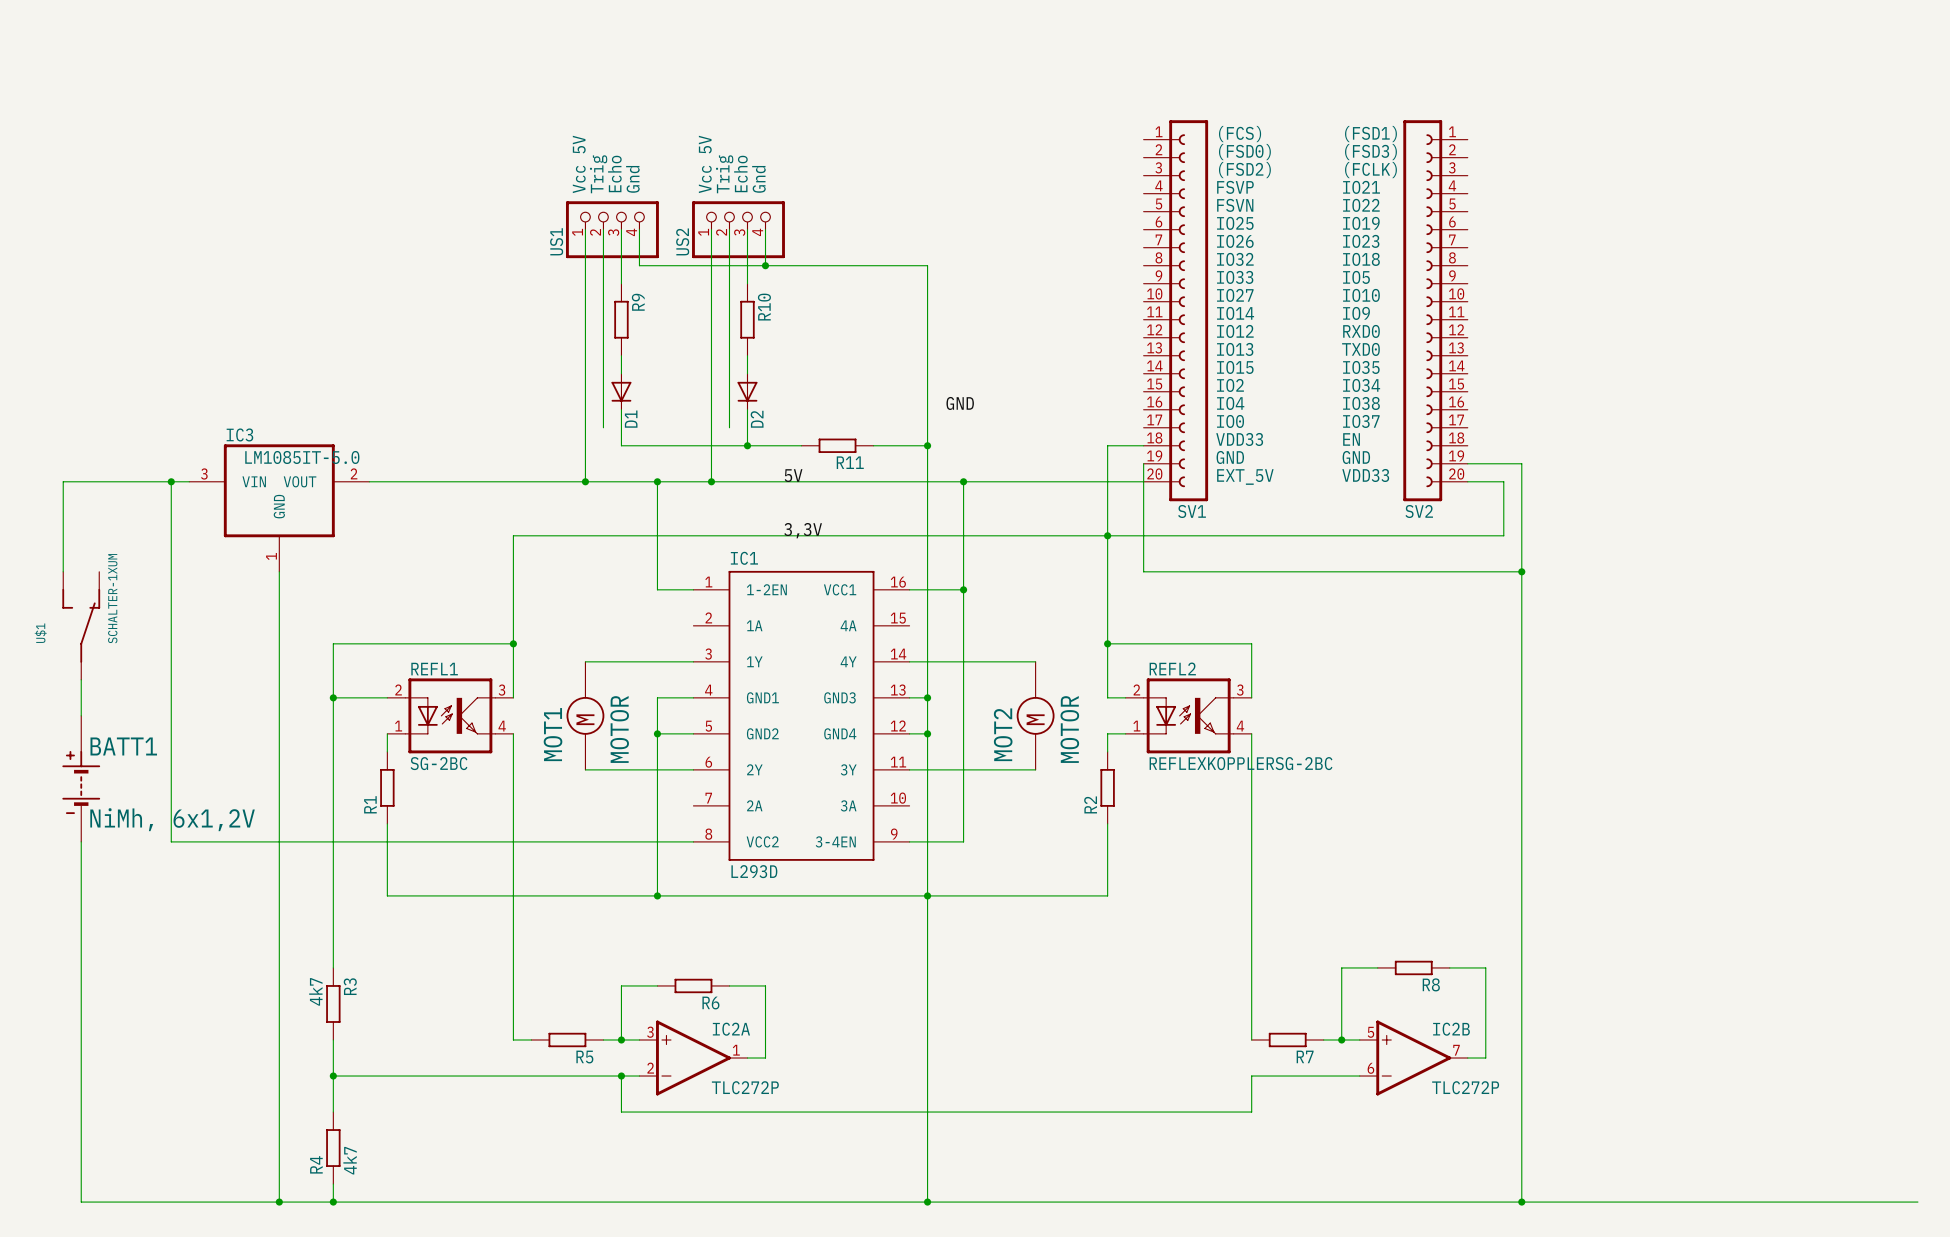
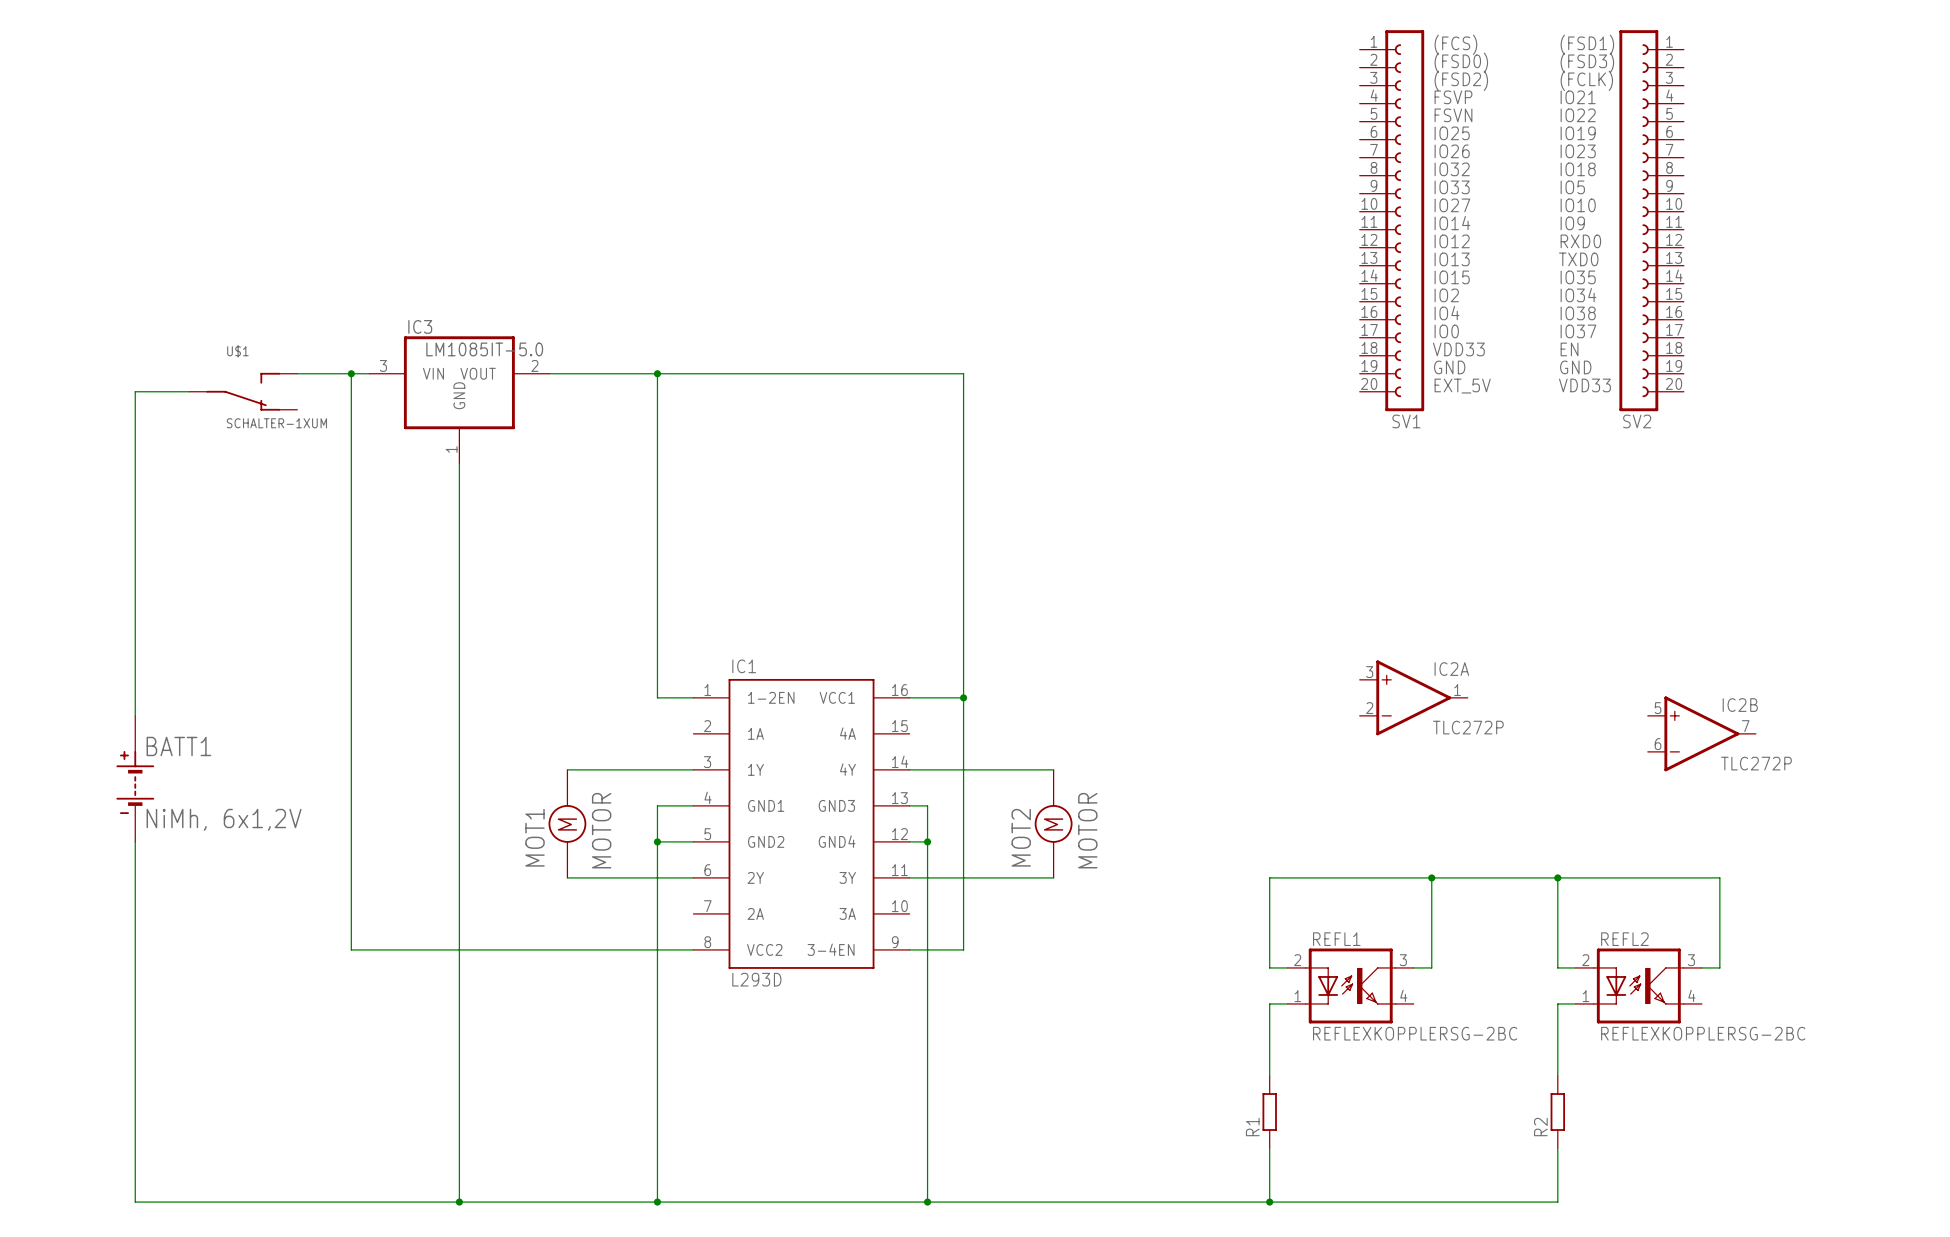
text: none -> (FCS) (1455, 44)
text: none -> (FSD1) (1587, 44)
text: none -> (FSD0) (1461, 62)
text: none -> (FSD3) (1587, 62)
text: none -> (FSD2) (1461, 80)
text: none -> (FCLK) (1586, 80)
text: none -> FSVP (1453, 97)
text: none -> IO21 (1578, 97)
text: none -> FSVN (1453, 115)
text: none -> IO22 (1578, 115)
text: none -> IO25 (1452, 133)
text: none -> IO19 (1578, 133)
text: (FCS) (1240, 134) -> none
text: (FSD1) (1370, 134) -> none
text: none -> IO26 (1452, 151)
text: none -> IO23 (1578, 151)
text: (FSD0) (1244, 152) -> none
text: (FSD3) (1370, 152) -> none
text: Vcc 5V (579, 164) -> none
text: Vcc 5V (705, 164) -> none
text: none -> IO32 (1452, 169)
text: none -> IO18 (1578, 169)
text: (FSD2) (1244, 170) -> none
text: (FCLK) (1370, 170) -> none
text: Echo (614, 173) -> none
text: Echo (740, 173) -> none
text: Trig (598, 174) -> none
text: Trig (724, 174) -> none
text: Gnd (632, 179) -> none
text: Gnd (758, 179) -> none
text: FSVP (1235, 187) -> none
text: IO21 (1361, 187) -> none
text: none -> IO33 (1452, 187)
text: none -> IO5 (1572, 187)
text: FSVN (1235, 205) -> none
text: IO22 (1361, 205) -> none
text: none -> IO27 (1452, 205)
text: none -> IO10 (1578, 205)
text: IO25 (1235, 223) -> none
text: IO19 (1361, 223) -> none
text: none -> IO14 (1452, 223)
text: none -> IO9 (1572, 223)
wire: (585, 229) (585, 481) -> none
wire: (603, 229) (603, 427) -> none
US1: (612, 229) -> none
wire: (621, 229) (621, 283) -> none
wire: (639, 229) (639, 265) (927, 265) (927, 805) -> (909, 805) (927, 805)
wire: (711, 229) (711, 481) -> none
wire: (729, 229) (729, 427) -> none
US2: (738, 229) -> none
wire: (747, 229) (747, 283) -> none
wire: (765, 229) (765, 265) -> none
text: IO26 (1235, 241) -> none
text: IO23 (1361, 241) -> none
text: none -> IO12 (1452, 241)
text: none -> RXD0 (1580, 241)
text: IO32 (1235, 259) -> none
text: IO18 (1361, 259) -> none
text: none -> IO13 (1452, 259)
text: none -> TXD0 (1578, 259)
junction: (765, 265) -> none
text: IO33 (1235, 277) -> none
text: IO5 (1356, 277) -> none
text: none -> IO15 (1452, 277)
text: none -> IO35 (1578, 277)
text: IO27 (1235, 295) -> none
text: IO10 (1361, 295) -> none
text: none -> IO2 (1446, 295)
text: none -> IO34 (1578, 295)
SV1 position: (1175, 310) -> (1391, 220)
SV2 position: (1435, 310) -> (1651, 220)
text: IO14 (1235, 313) -> none
text: IO9 (1356, 313) -> none
text: none -> IO4 (1447, 313)
text: none -> IO38 (1578, 313)
R9: (621, 319) -> none
R10: (747, 319) -> none
text: IO12 (1235, 331) -> none
text: RXD0 (1361, 331) -> none
text: none -> IO0 (1446, 331)
text: none -> IO37 (1578, 331)
text: IO13 (1235, 349) -> none
text: TXD0 (1360, 349) -> none
text: none -> VDD33 (1458, 349)
text: none -> EN (1569, 349)
wire: (621, 355) (621, 373) -> none
wire: (747, 355) (747, 373) -> none
text: IO15 (1235, 367) -> none
text: IO35 (1361, 367) -> none
text: none -> GND (1449, 367)
text: none -> GND (1575, 367)
wire: none -> (297, 373) (369, 373)
wire: none -> (351, 373) (351, 949) (693, 949)
junction: none -> (351, 373)
wire: none -> (549, 373) (963, 373) (963, 481)
wire: none -> (657, 373) (657, 481)
junction: none -> (657, 373)
text: IO2 (1230, 385) -> none
text: IO34 (1361, 385) -> none
text: none -> VDD33 (1584, 385)
text: none -> EXT_5V (1462, 386)
wire: none -> (189, 391) (135, 391) (135, 715)
D1: (621, 391) -> none
D2: (747, 391) -> none
label: GND (960, 403) -> none
text: IO4 (1230, 403) -> none
text: IO38 (1361, 403) -> none
wire: (621, 409) (621, 445) (801, 445) -> none
wire: (747, 409) (747, 445) -> none
text: IO0 (1230, 421) -> none
text: IO37 (1361, 421) -> none
text: VDD33 (1239, 439) -> none
text: EN (1351, 439) -> none
junction: (747, 445) -> none
R11: (837, 445) -> none
wire: (873, 445) (927, 445) -> none
junction: (927, 445) -> none
wire: (1143, 445) (1107, 445) (1107, 697) (1125, 697) -> none
text: GND (1230, 457) -> none
text: GND (1356, 457) -> none
wire: none -> (459, 463) (459, 1202)
wire: (1143, 463) (1143, 571) (1521, 571) -> none
wire: (1467, 463) (1521, 463) (1521, 1202) -> none
label: 5V (793, 475) -> none
text: VDD33 (1365, 475) -> none
text: EXT_5V (1245, 477) -> none
wire: (171, 481) (171, 841) (657, 841) -> none
junction: (171, 481) -> none
wire: (189, 481) (63, 481) (63, 571) -> none
wire: (369, 481) (1143, 481) -> none
junction: (585, 481) -> none
junction: (657, 481) -> none
junction: (711, 481) -> none
junction: (963, 481) -> none
wire: (1467, 481) (1503, 481) (1503, 535) (513, 535) (513, 697) -> none
IC3 position: (279, 508) -> (459, 400)
label: 3,3V (803, 530) -> none
junction: (1107, 535) -> none
wire: (279, 571) (279, 1202) -> none
junction: (1521, 571) -> none
wire: (657, 589) (693, 589) -> (657, 589) (657, 697)
wire: (909, 589) (963, 589) -> none
junction: (963, 589) -> none
U$1 rotation: 0° (81, 625) -> 90° clockwise (243, 391)
U$1 position: (81, 625) -> (243, 391)
wire: (513, 643) (333, 643) (333, 967) -> none
junction: (513, 643) -> none
wire: (1107, 643) (1251, 643) (1251, 697) -> none
junction: (1107, 643) -> none
wire: (585, 661) (693, 661) -> none
wire: (909, 661) (1035, 661) -> none
wire: (81, 679) (81, 715) -> none
wire: (333, 697) (387, 697) -> none
junction: (333, 697) -> none
wire: (657, 697) (657, 805) -> (693, 805) (657, 805)
wire: none -> (927, 697) (963, 697)
junction: (927, 697) -> none
junction: none -> (963, 697)
REFL1 position: (450, 715) -> (1350, 985)
MOT1 position: (585, 715) -> (567, 823)
IC1 position: (801, 715) -> (801, 823)
MOT2 position: (1035, 715) -> (1053, 823)
REFL2 position: (1188, 715) -> (1638, 985)
wire: (387, 733) (387, 751) -> none
wire: (513, 733) (513, 1039) (531, 1039) -> none
wire: (657, 733) (693, 733) -> none
junction: (657, 733) -> none
wire: (909, 733) (927, 733) -> (1035, 769) (1053, 769)
junction: (927, 733) -> none
wire: (1125, 733) (1107, 733) (1107, 751) -> none
wire: (1251, 733) (1251, 1039) -> none
REFL1 value: SG-2BC (438, 763) -> REFLEXKOPPLERSG-2BC (1415, 1033)
wire: none -> (567, 769) (585, 769)
BATT1 position: (81, 778) -> (135, 778)
R1 position: (387, 787) -> (1269, 1112)
R2 position: (1107, 787) -> (1557, 1112)
wire: (387, 823) (387, 895) (1107, 895) (1107, 823) -> none
wire: (81, 841) (81, 1202) (135, 1202) -> (135, 841) (135, 1202)
junction: none -> (657, 841)
wire: (927, 841) (963, 841) -> (909, 949) (963, 949) (963, 841)
junction: none -> (927, 841)
wire: none -> (567, 877) (693, 877)
wire: none -> (909, 877) (1053, 877)
wire: none -> (1431, 877) (1431, 967) (1413, 967)
junction: none -> (1431, 877)
wire: none -> (1557, 877) (1557, 967) (1575, 967)
junction: none -> (1557, 877)
wire: none -> (657, 895) (657, 1202)
junction: (657, 895) -> none
junction: (927, 895) -> none
wire: none -> (1287, 967) (1269, 967) (1269, 877) (1719, 877) (1719, 967) (1701, 967)
wire: (1377, 967) (1341, 967) (1341, 1039) -> none
R8: (1413, 967) -> none
wire: (1449, 967) (1485, 967) (1485, 1058) (1467, 1058) -> none
wire: (657, 985) (621, 985) (621, 1039) -> none
R6: (693, 985) -> none
wire: (729, 985) (765, 985) (765, 1058) (747, 1058) -> none
R3: 4k7 (333, 1003) -> none
wire: none -> (1287, 1003) (1269, 1003) (1269, 1076)
wire: none -> (1575, 1003) (1557, 1003) (1557, 1076)
wire: (333, 1039) (333, 1112) -> none
R5: (567, 1039) -> none
wire: (603, 1039) (639, 1039) -> none
junction: (621, 1039) -> none
R7: (1287, 1039) -> none
wire: (1323, 1039) (1359, 1039) -> none
junction: (1341, 1039) -> none
IC2A position: (693, 1058) -> (1413, 697)
IC2B position: (1413, 1058) -> (1701, 733)
wire: (333, 1076) (639, 1076) -> none
junction: (333, 1076) -> none
wire: (621, 1076) (621, 1112) (1251, 1112) (1251, 1076) (1359, 1076) -> none
junction: (621, 1076) -> none
R4: 4k7 (333, 1148) -> none
wire: none -> (1269, 1148) (1269, 1202)
wire: (333, 1184) (333, 1202) -> none
junction: (279, 1202) -> none
junction: (333, 1202) -> none
junction: none -> (459, 1202)
junction: none -> (657, 1202)
junction: none -> (1269, 1202)
junction: (1521, 1202) -> none
wire: (1557, 1202) (1917, 1202) -> (1557, 1202) (1557, 1148)

